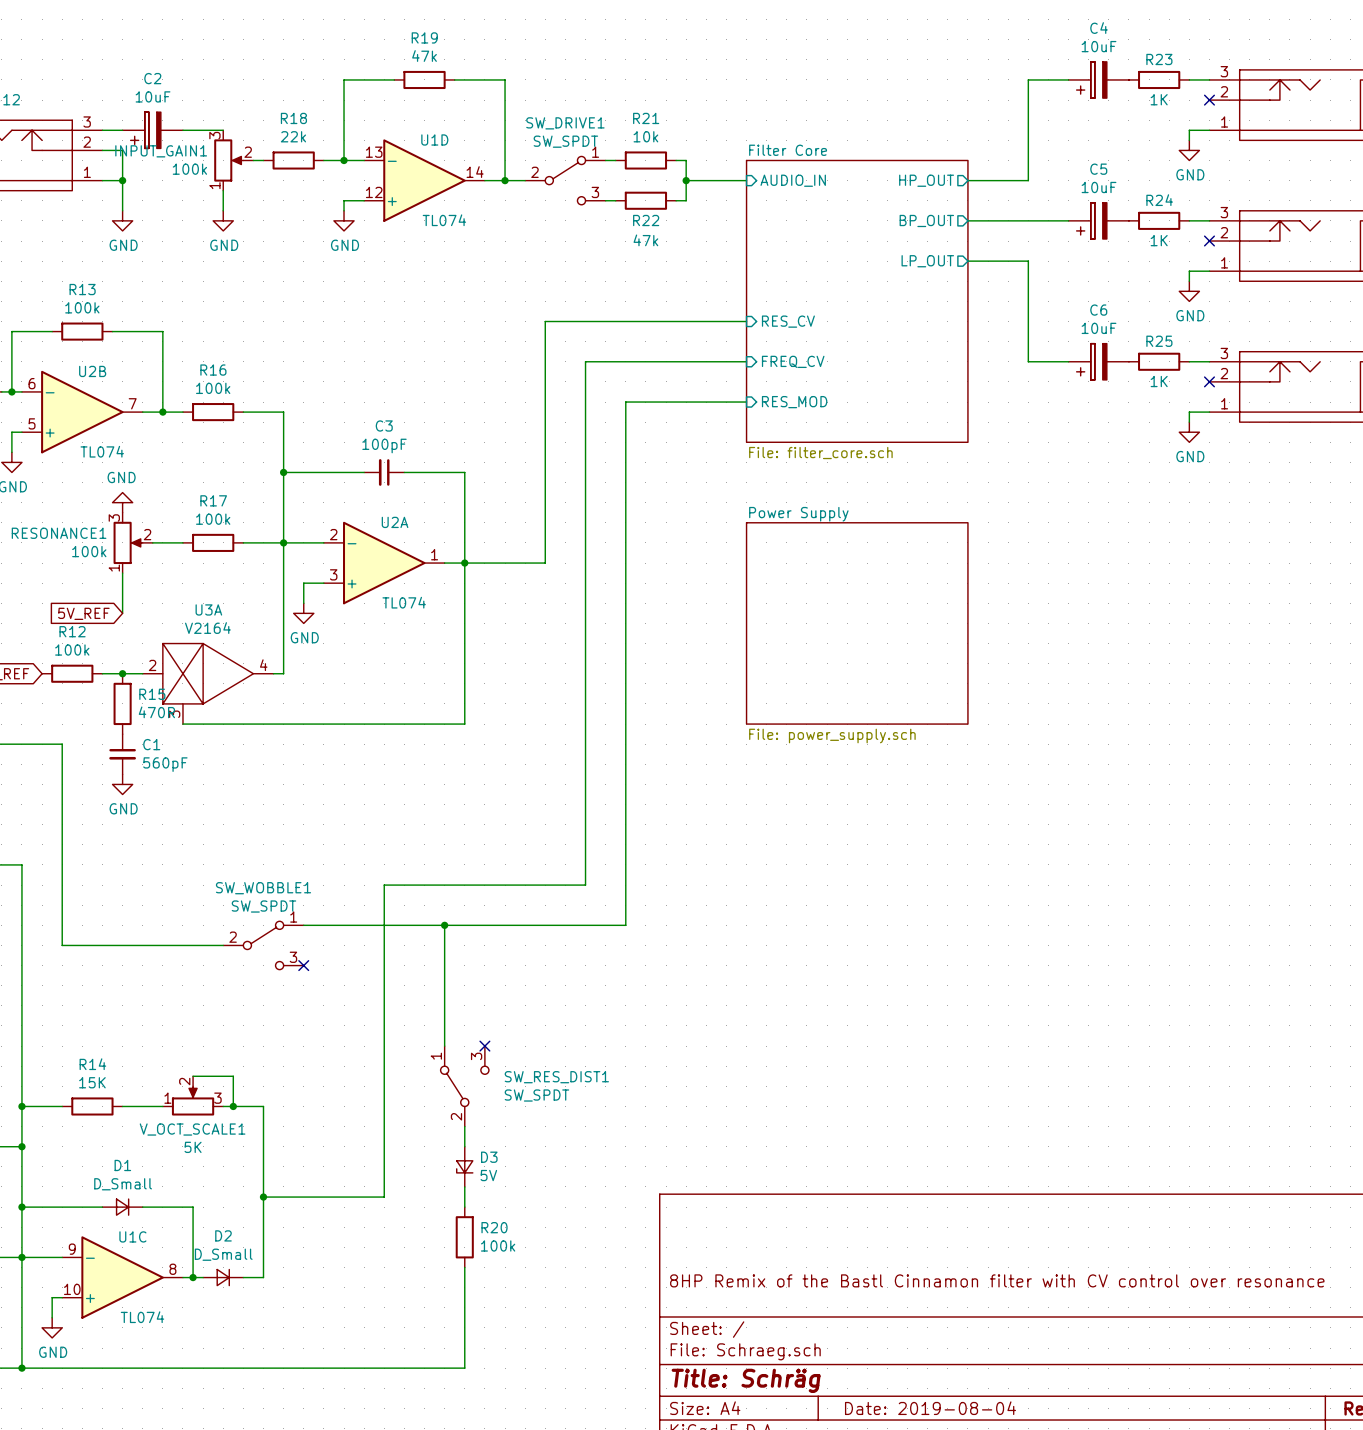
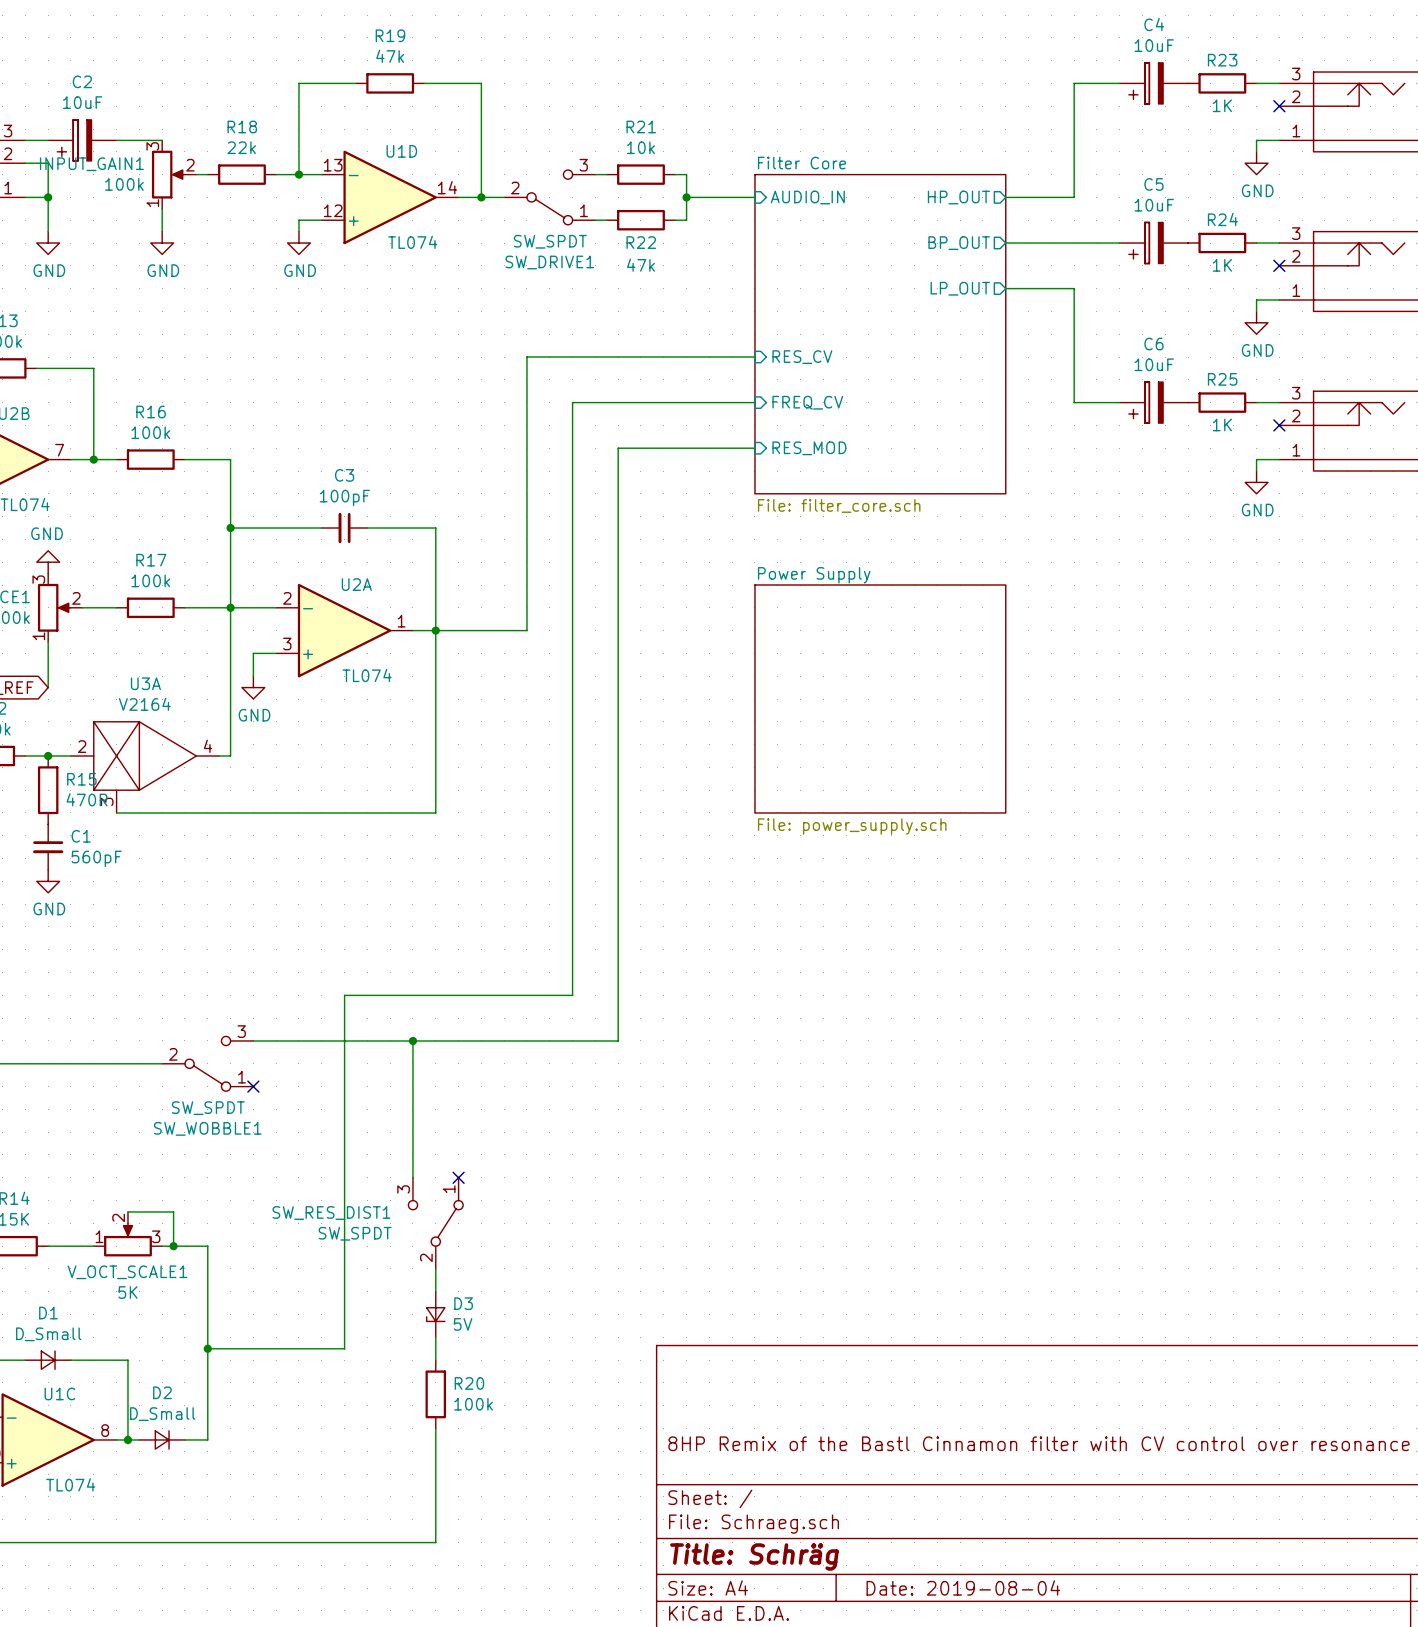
SW_DRIVE1 flip: as is (565, 180) -> up-down (549, 197)
SW_WOBBLE1 flip: as is (263, 945) -> up-down (207, 1063)
SW_RES_DIST1 flip: as is (464, 1086) -> left-right (435, 1223)

